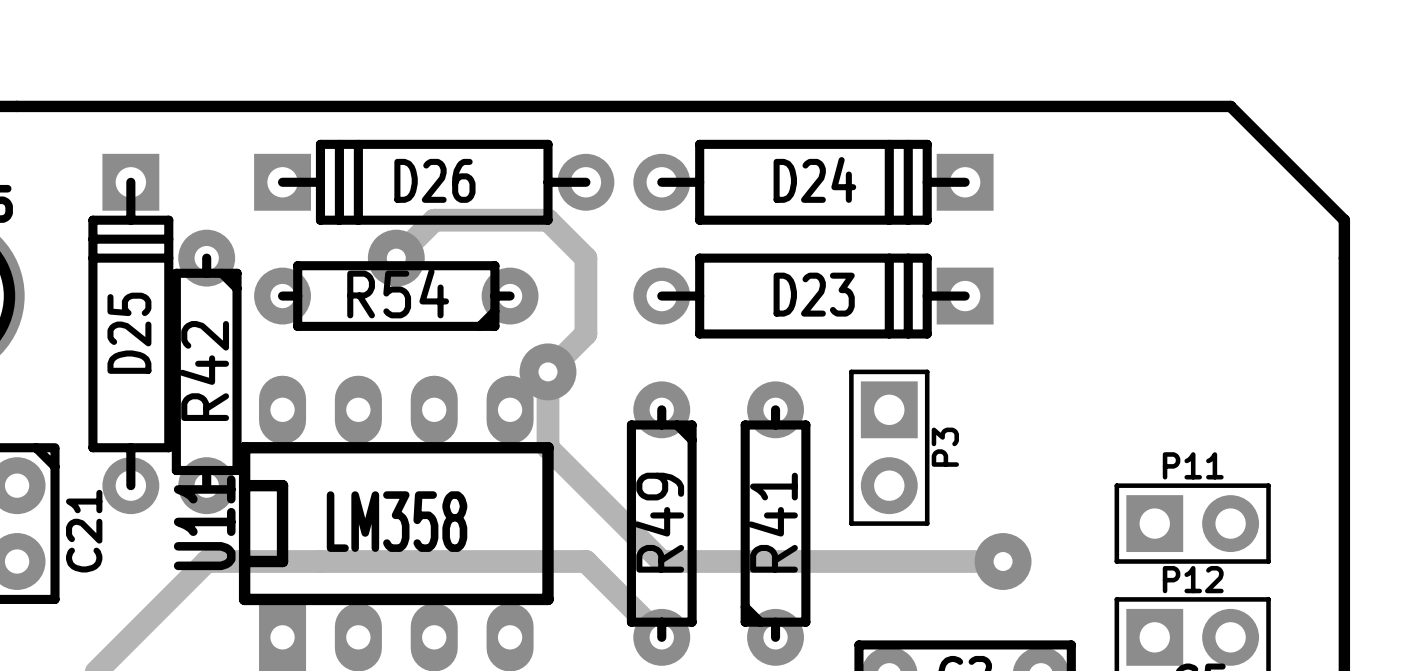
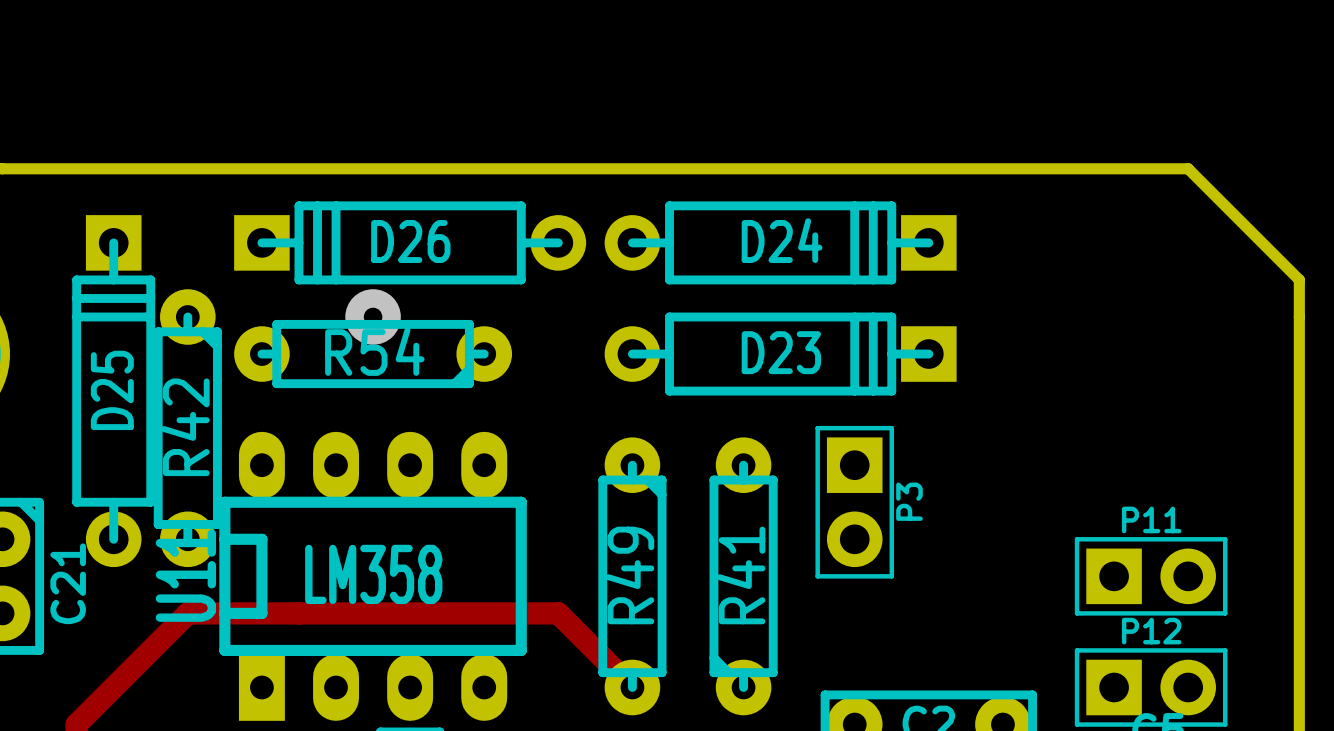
track: (396, 258) (434, 220) (547, 220) (585, 258) (585, 333) (547, 371) (547, 447) (661, 561) (1003, 561) -> none
via: (547, 371) -> none
via: (1003, 561) -> none

